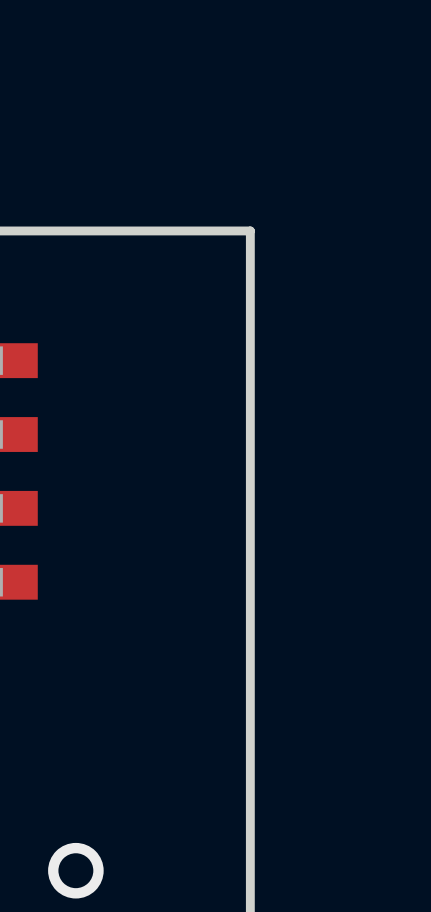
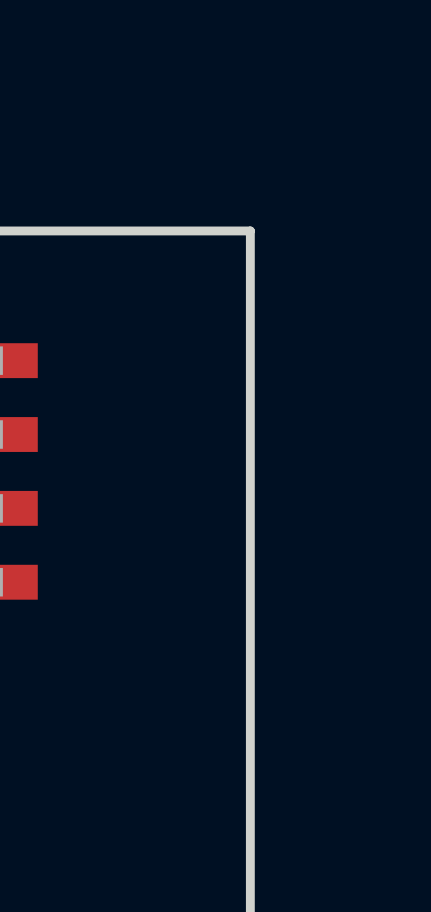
via: (75, 870) -> none

